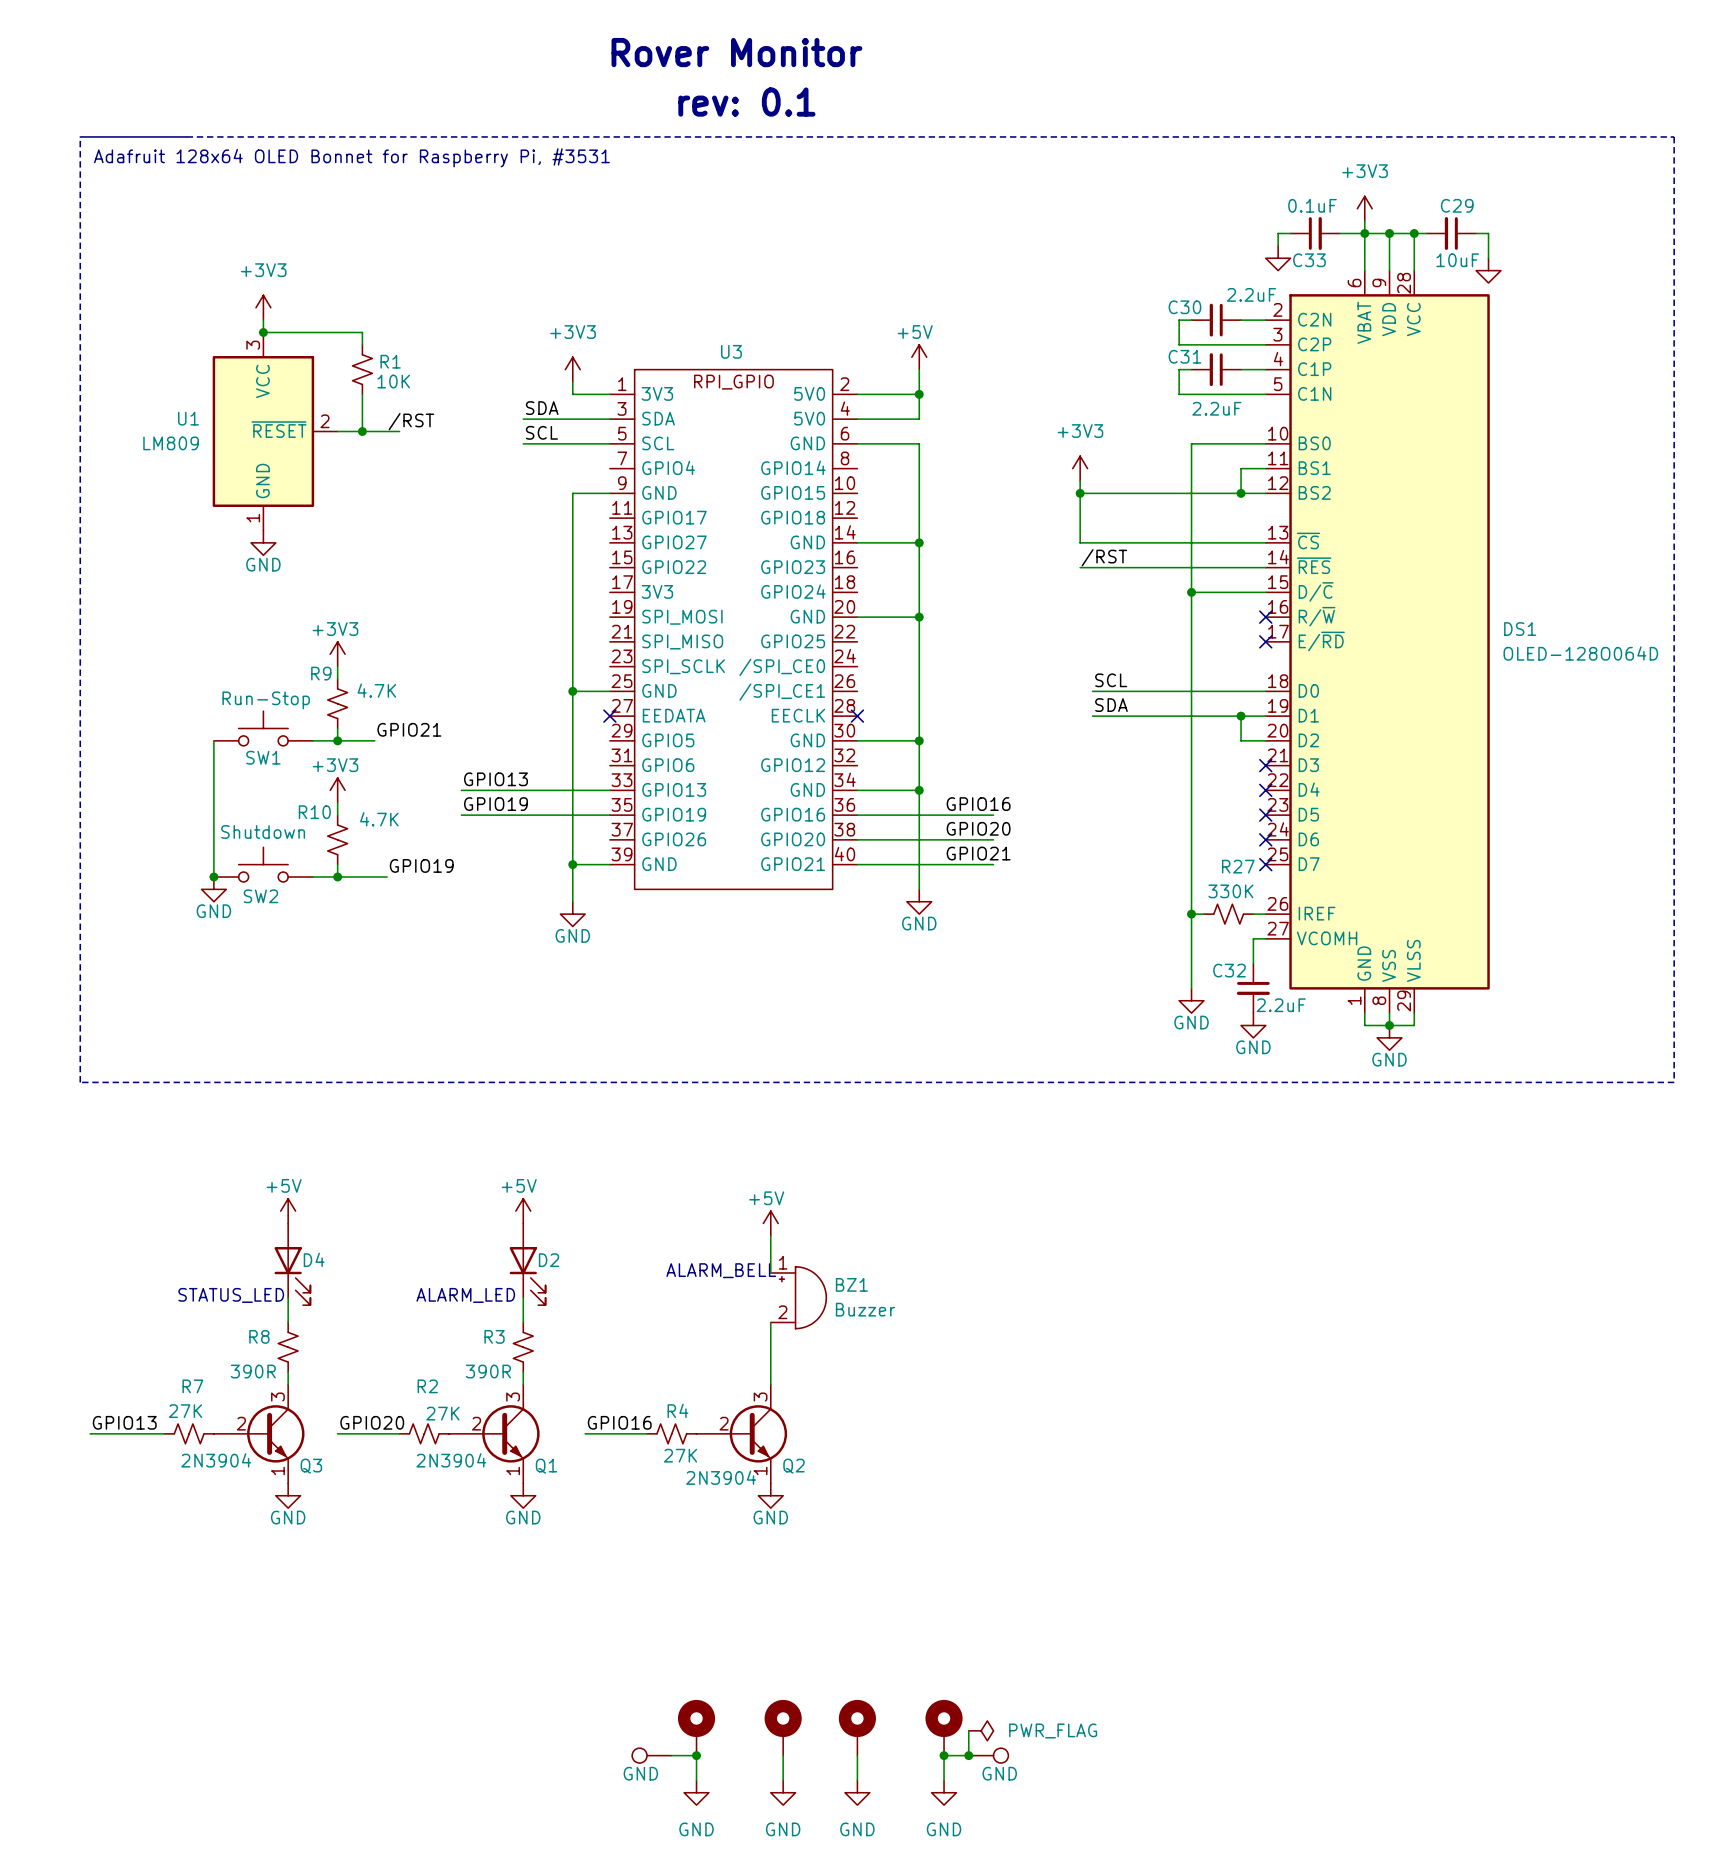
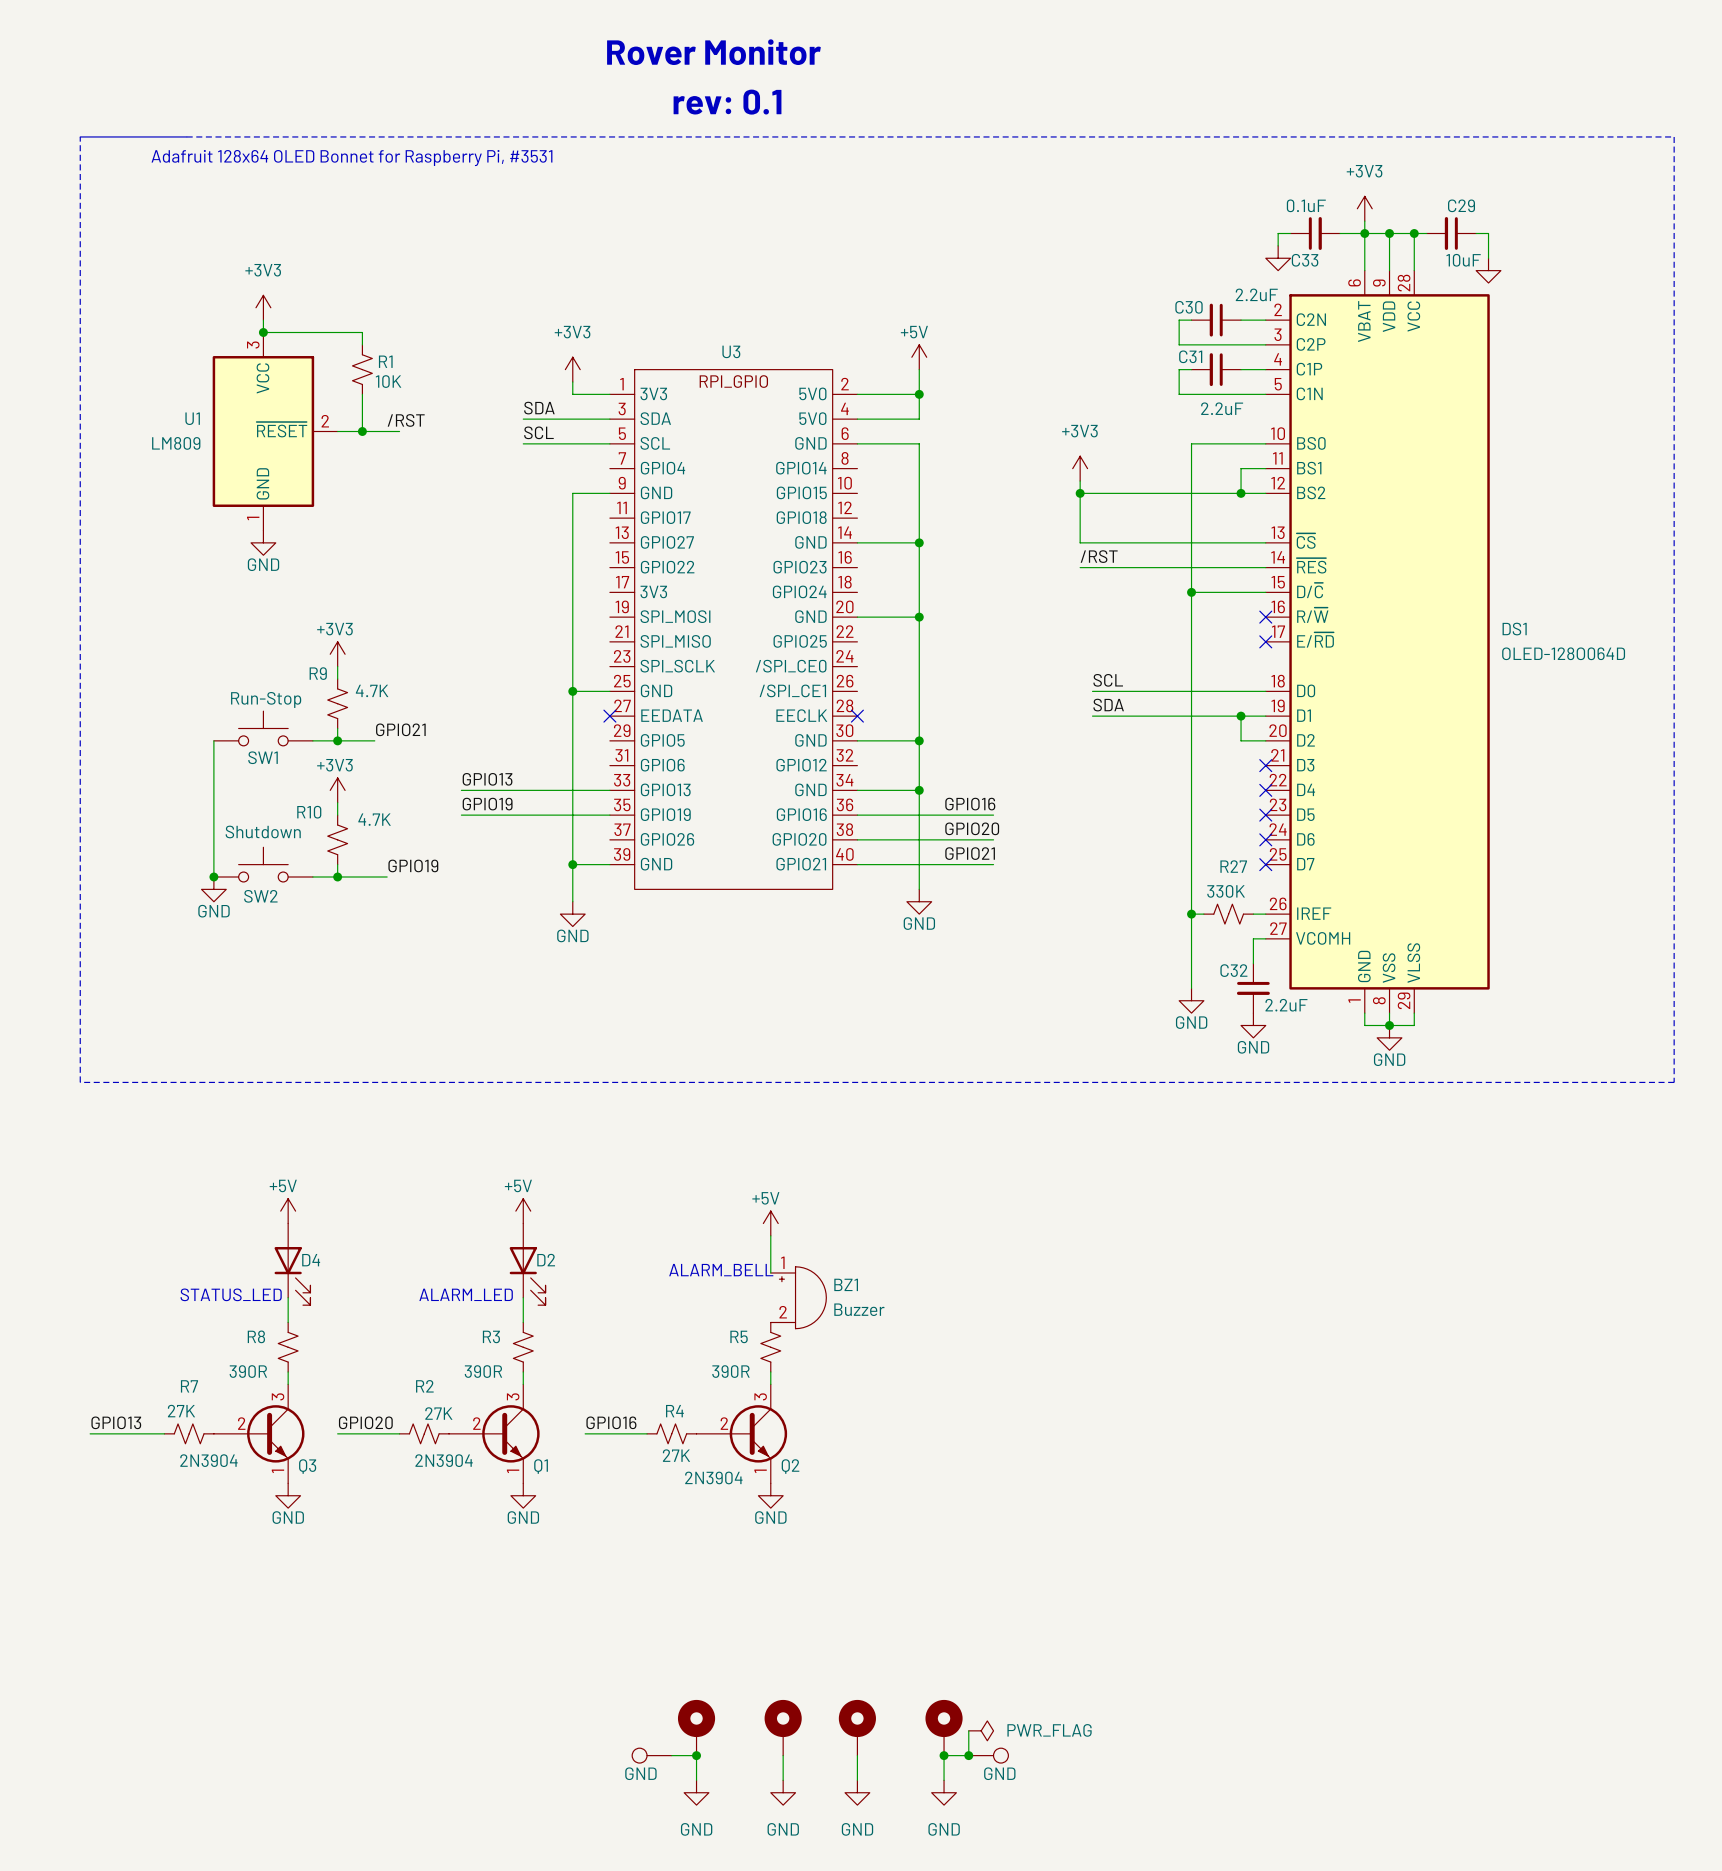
R5: none -> 390R (770, 1347)

